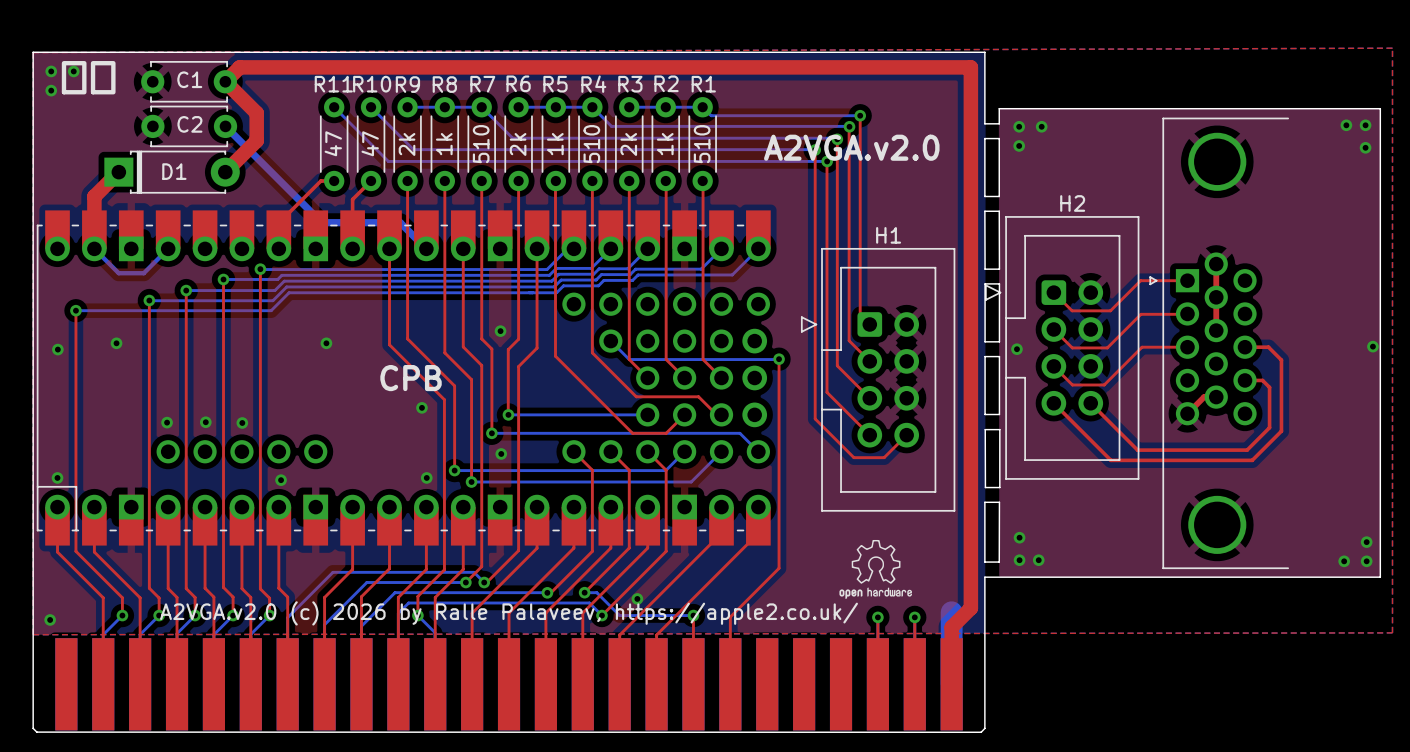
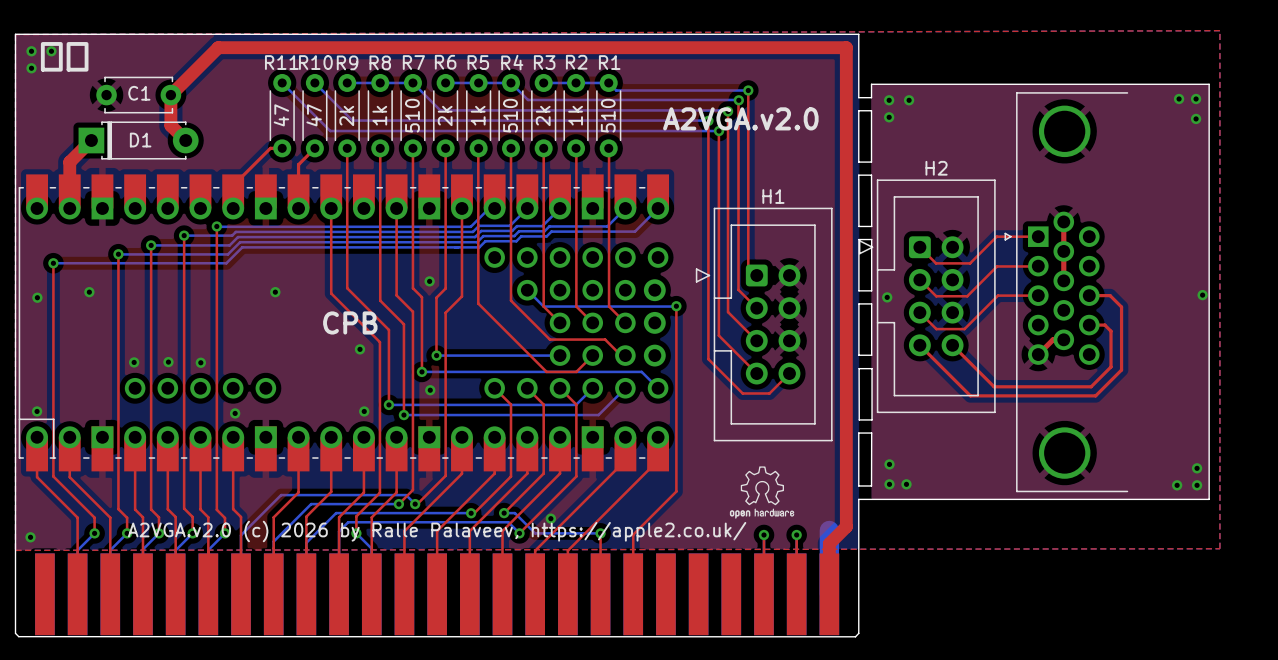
top track: (262, 67) (239, 67) (225, 81) (256, 113) (256, 140) (225, 172) -> (218, 47) (170, 95) (170, 125) (185, 140)
C1 position: (189, 81) -> (138, 95)
C2: (189, 126) -> none
bottom track: (225, 126) (321, 222) (400, 222) (426, 248) -> none
bottom track: (94, 248) (118, 273) (143, 273) (168, 248) -> none

